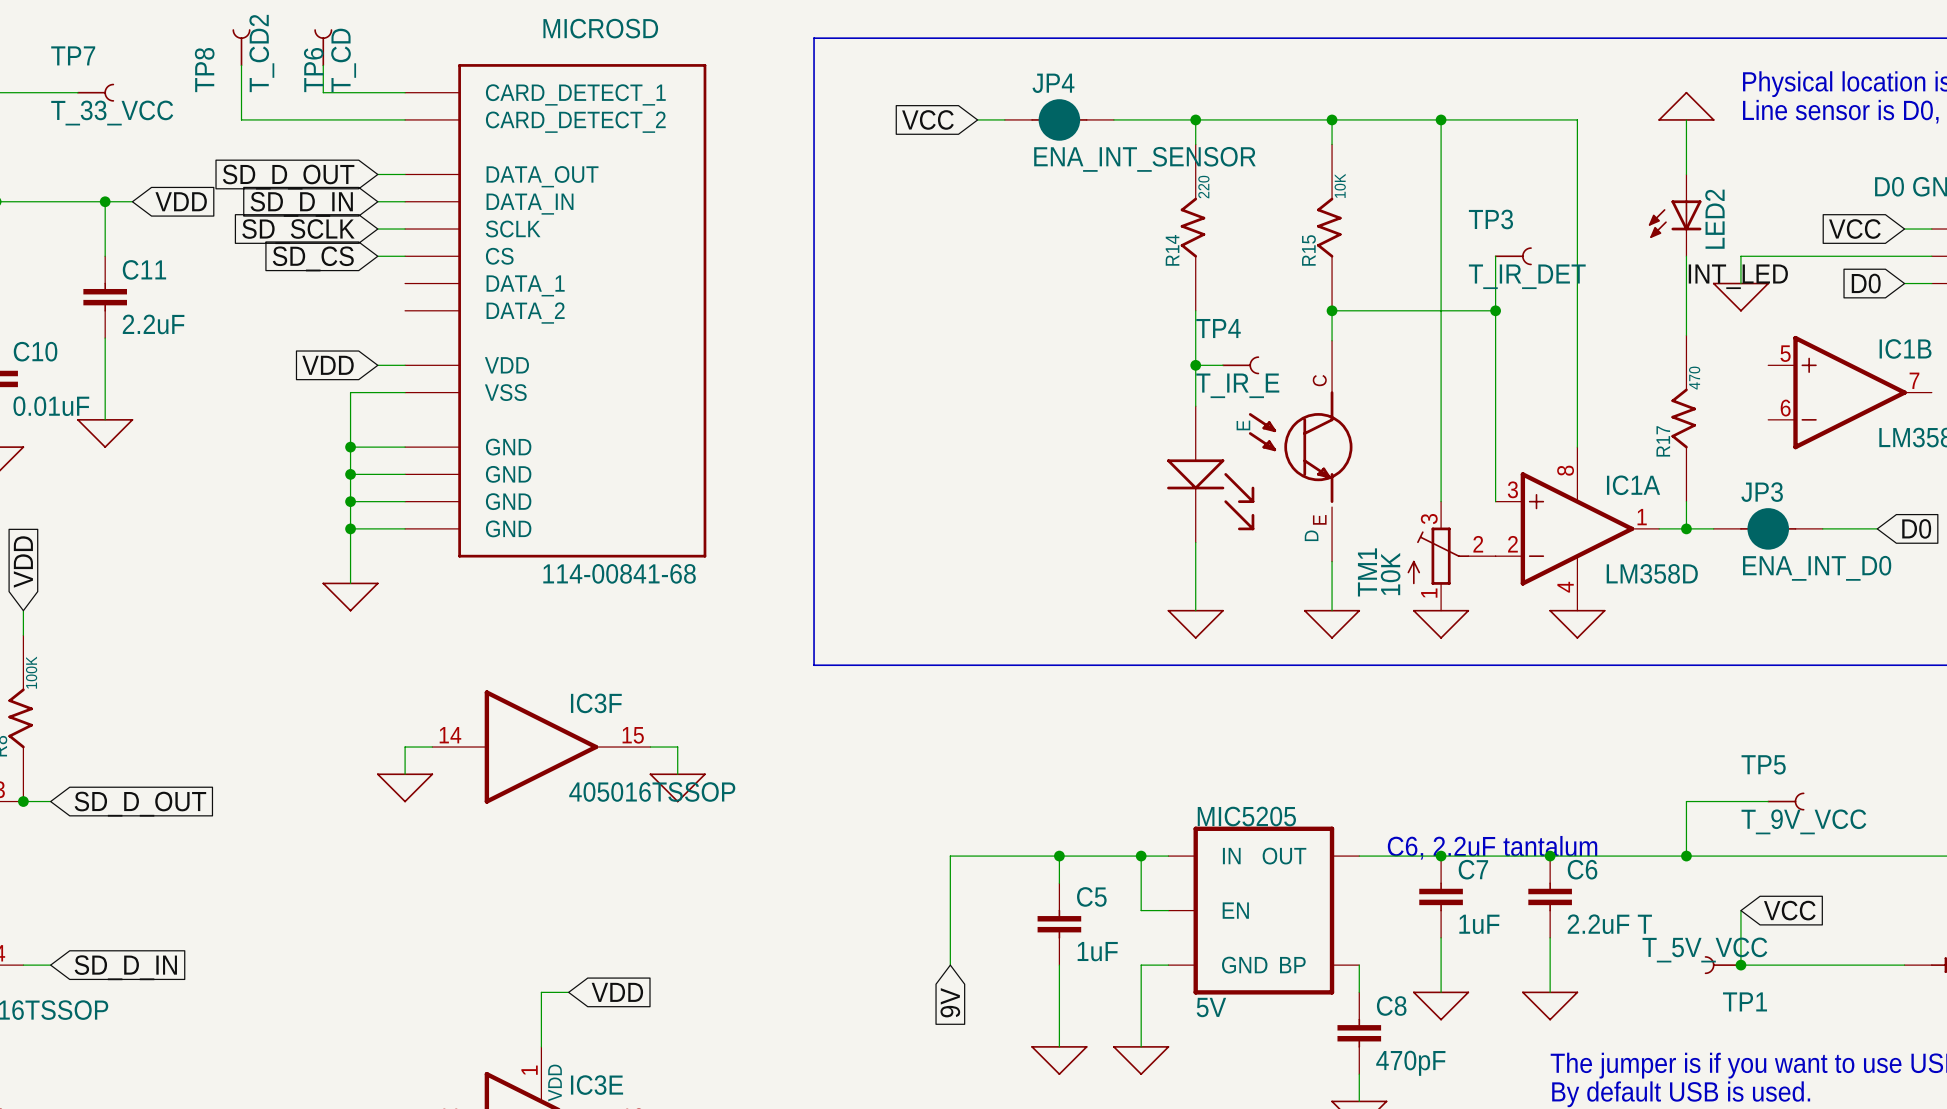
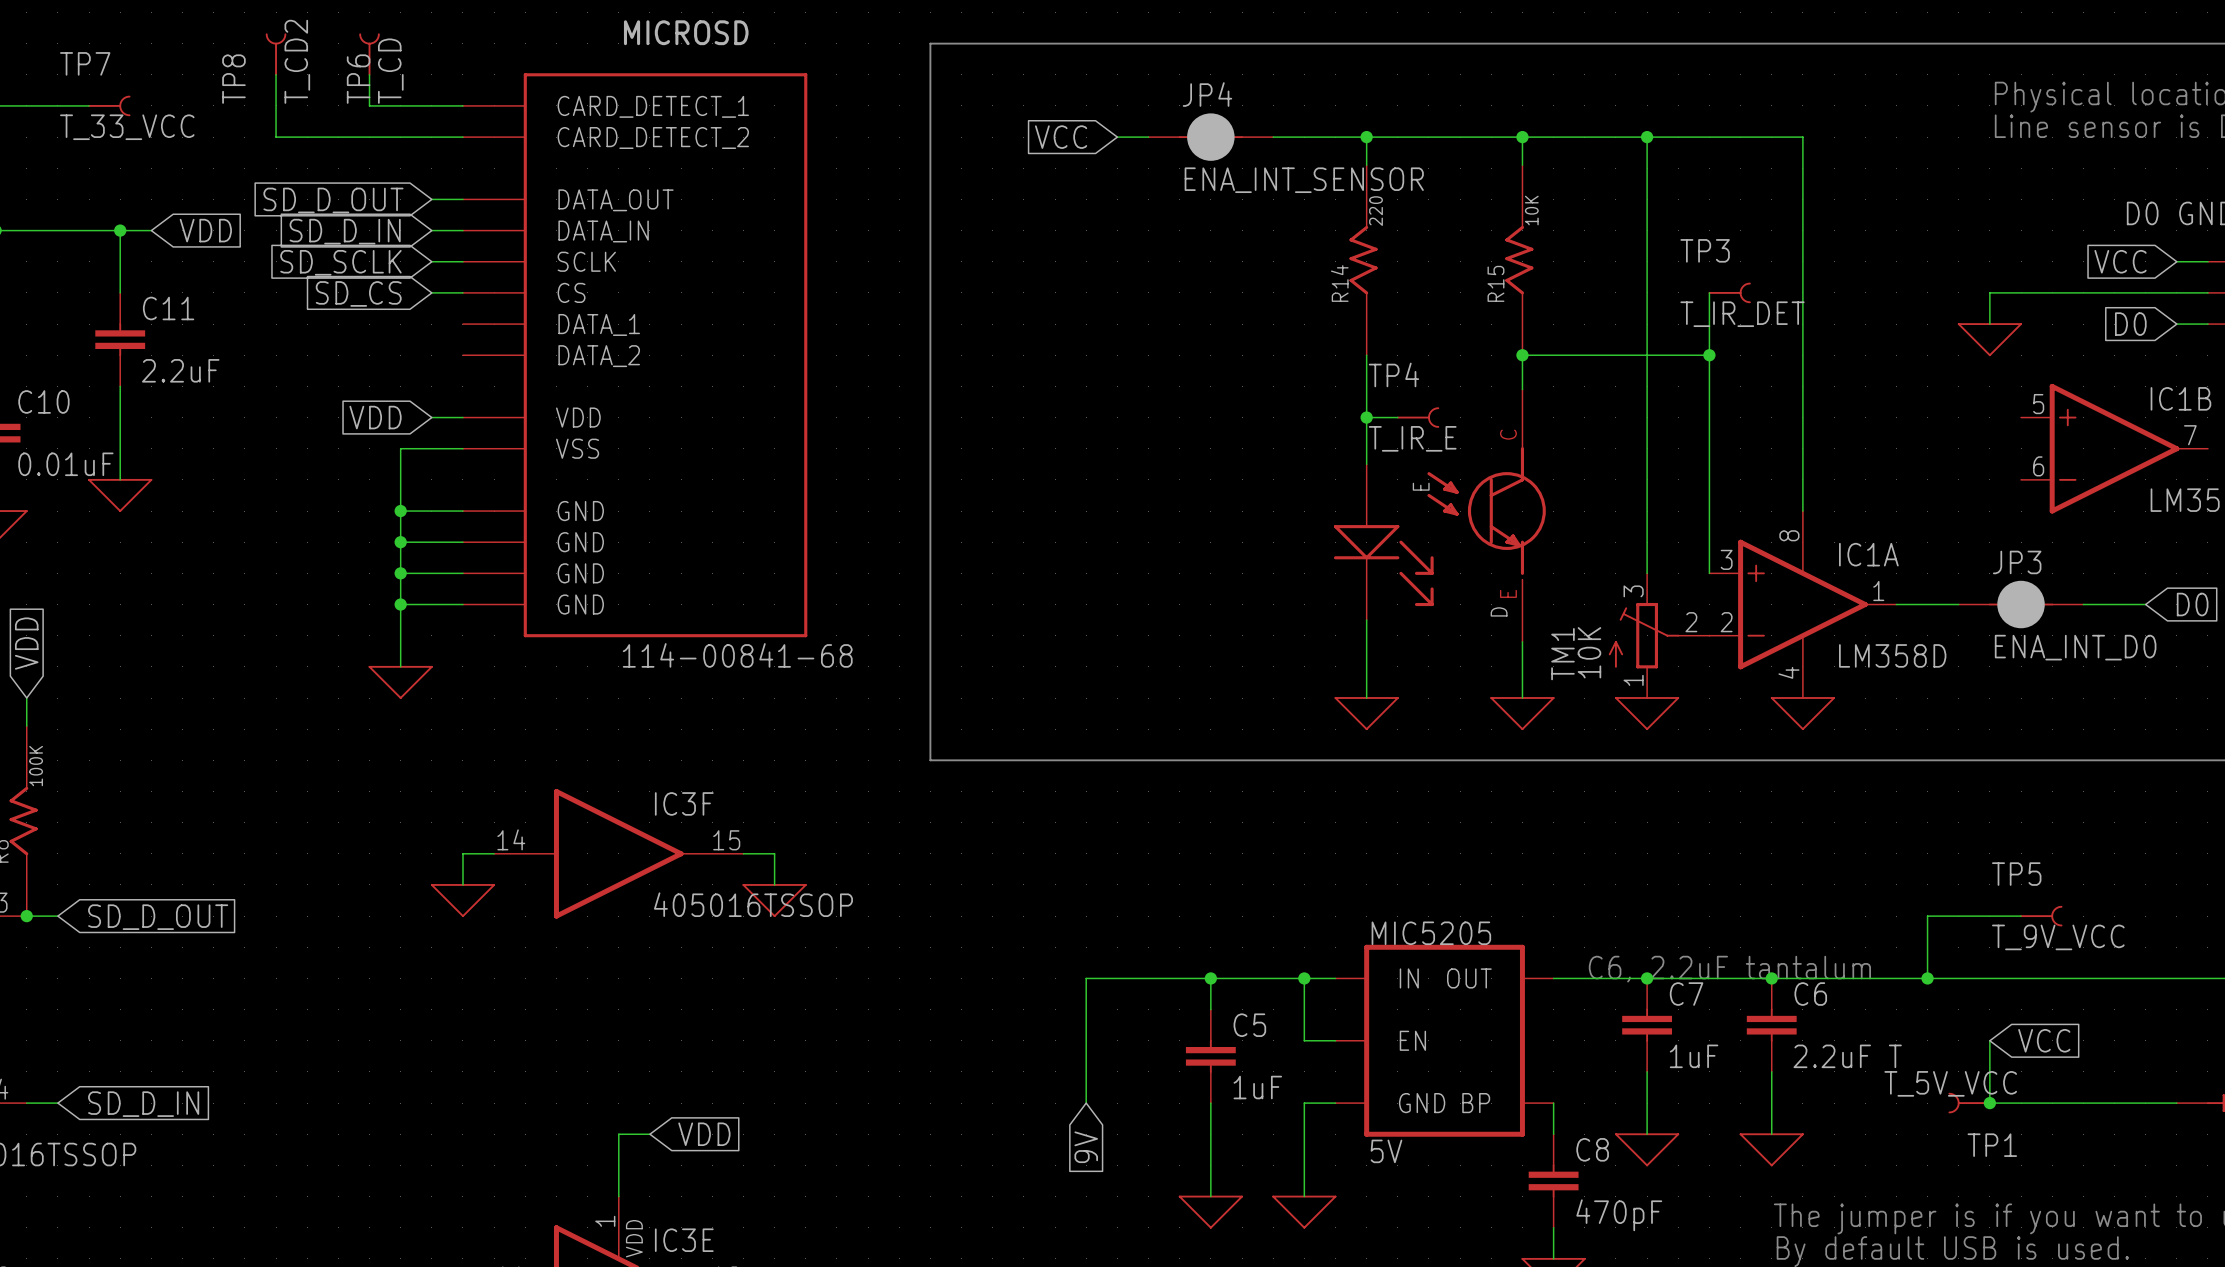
power symbol: (1686, 106) -> none
wire: (1686, 119) (1686, 174) -> none
LED2: (1675, 215) -> none
wire: (1686, 256) (1686, 335) -> none
label: INT_LED (1738, 276) -> none
R17: 470 (1683, 418) -> none
wire: (1686, 501) (1686, 528) -> none
junction: (1686, 528) -> none

